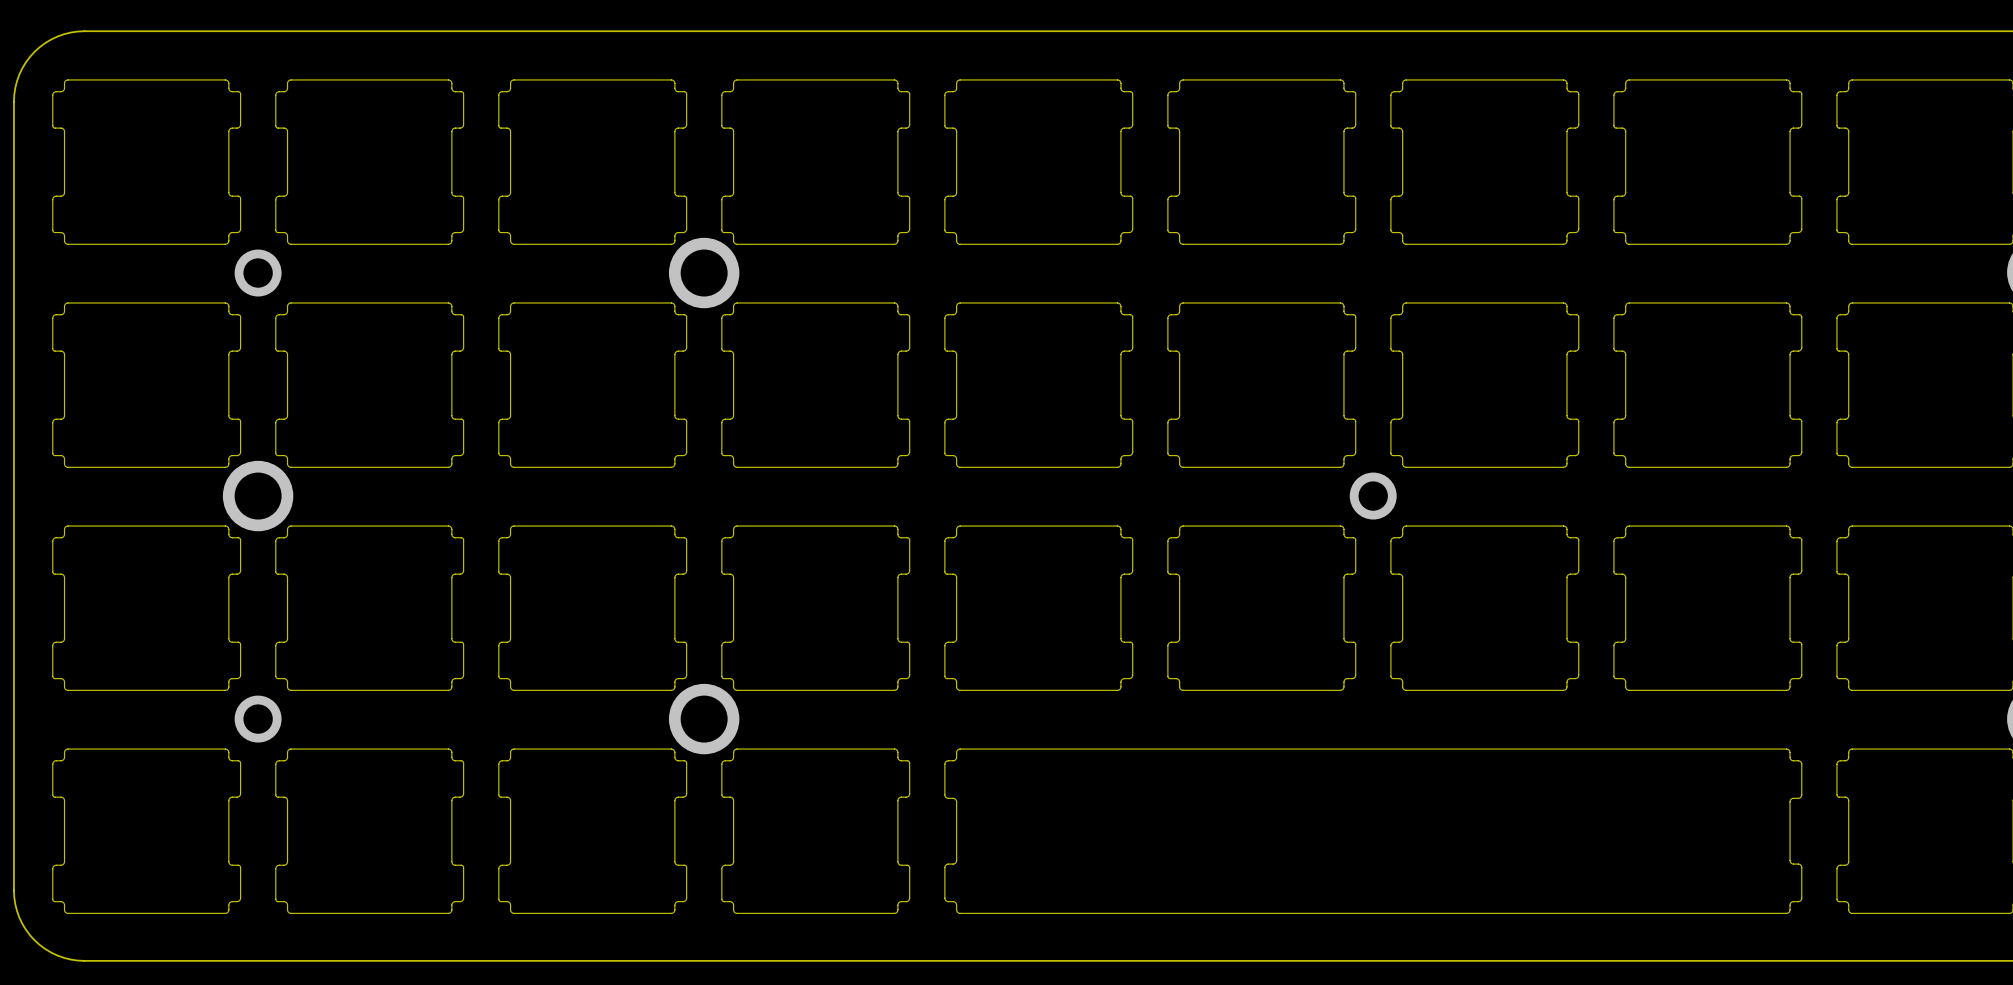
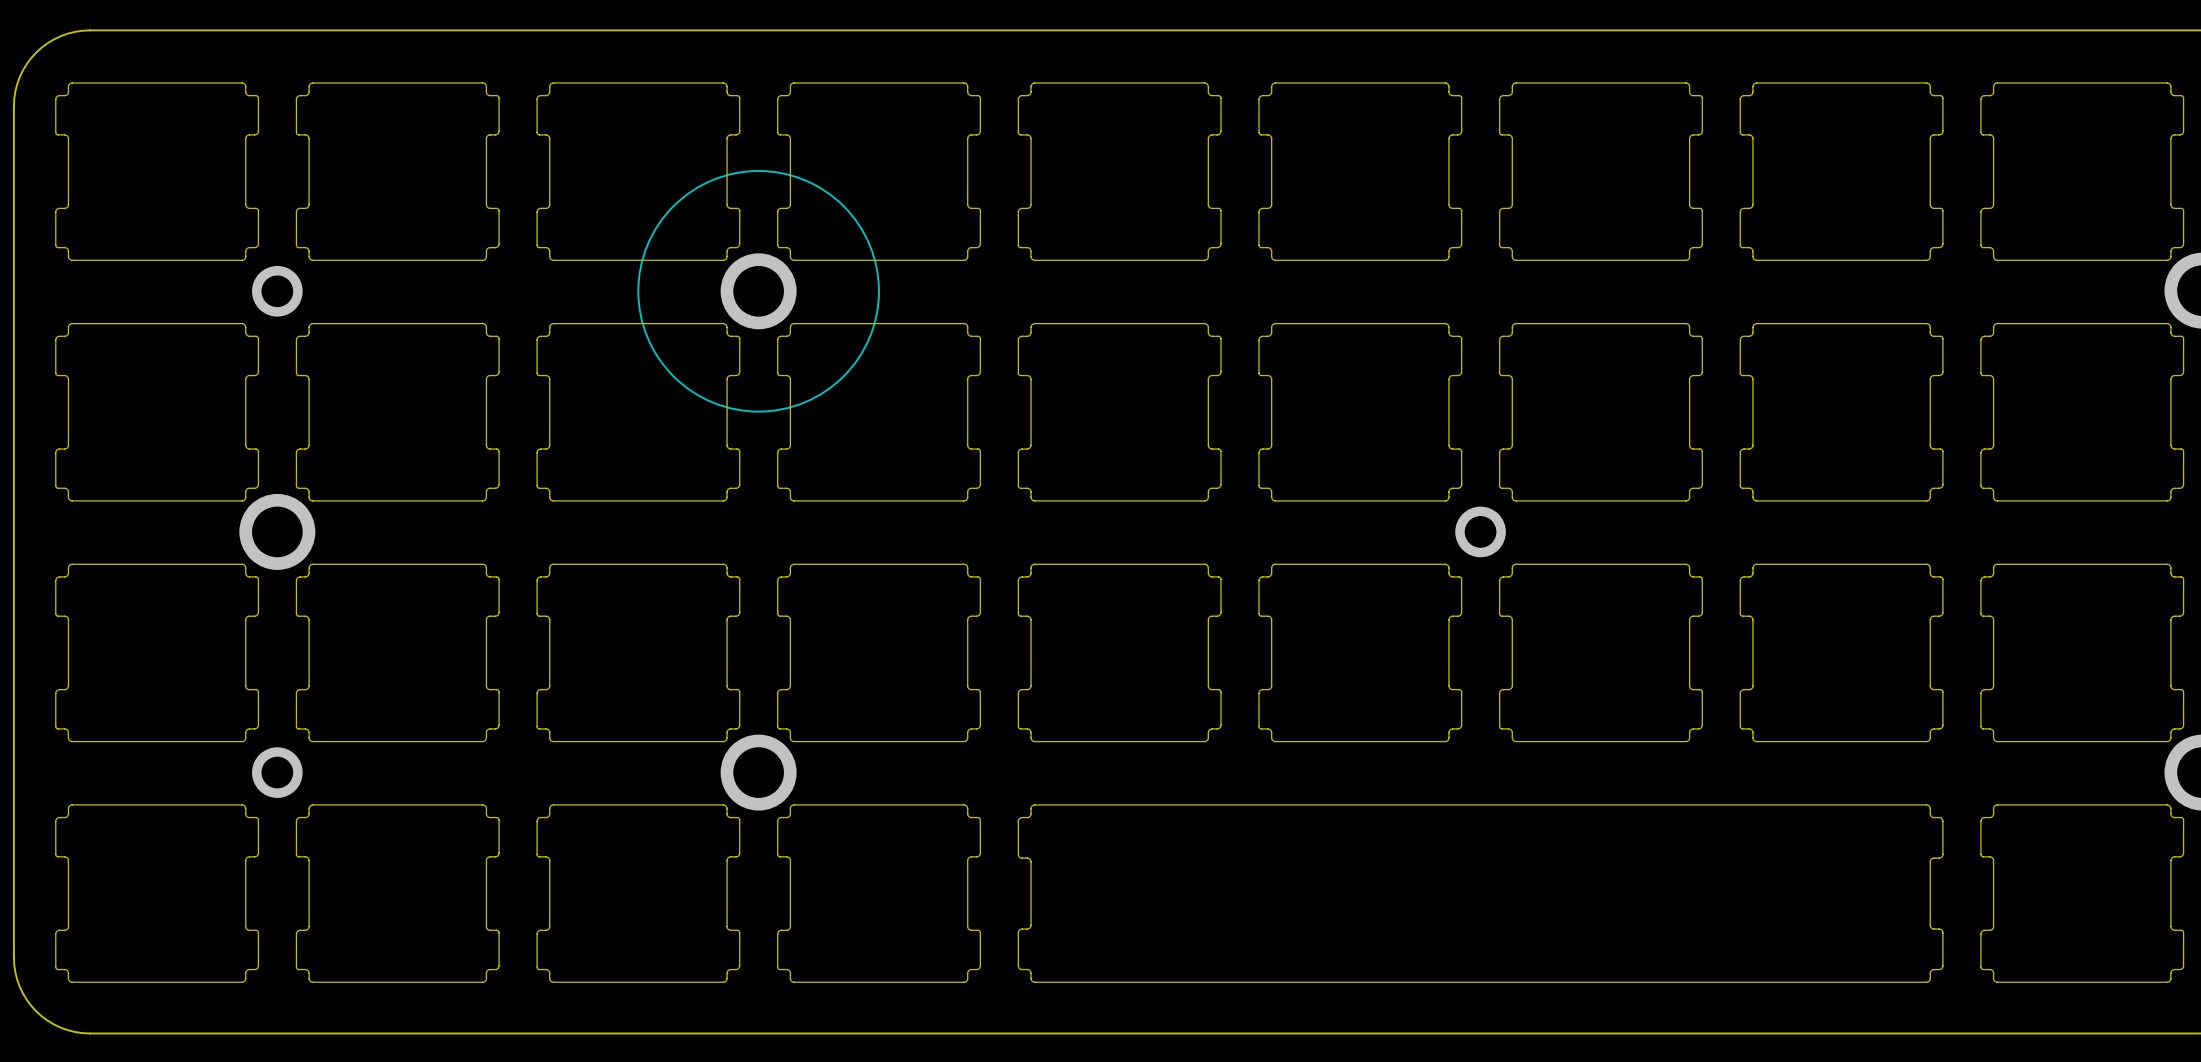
drawing: none -> [637, 170, 880, 413]

